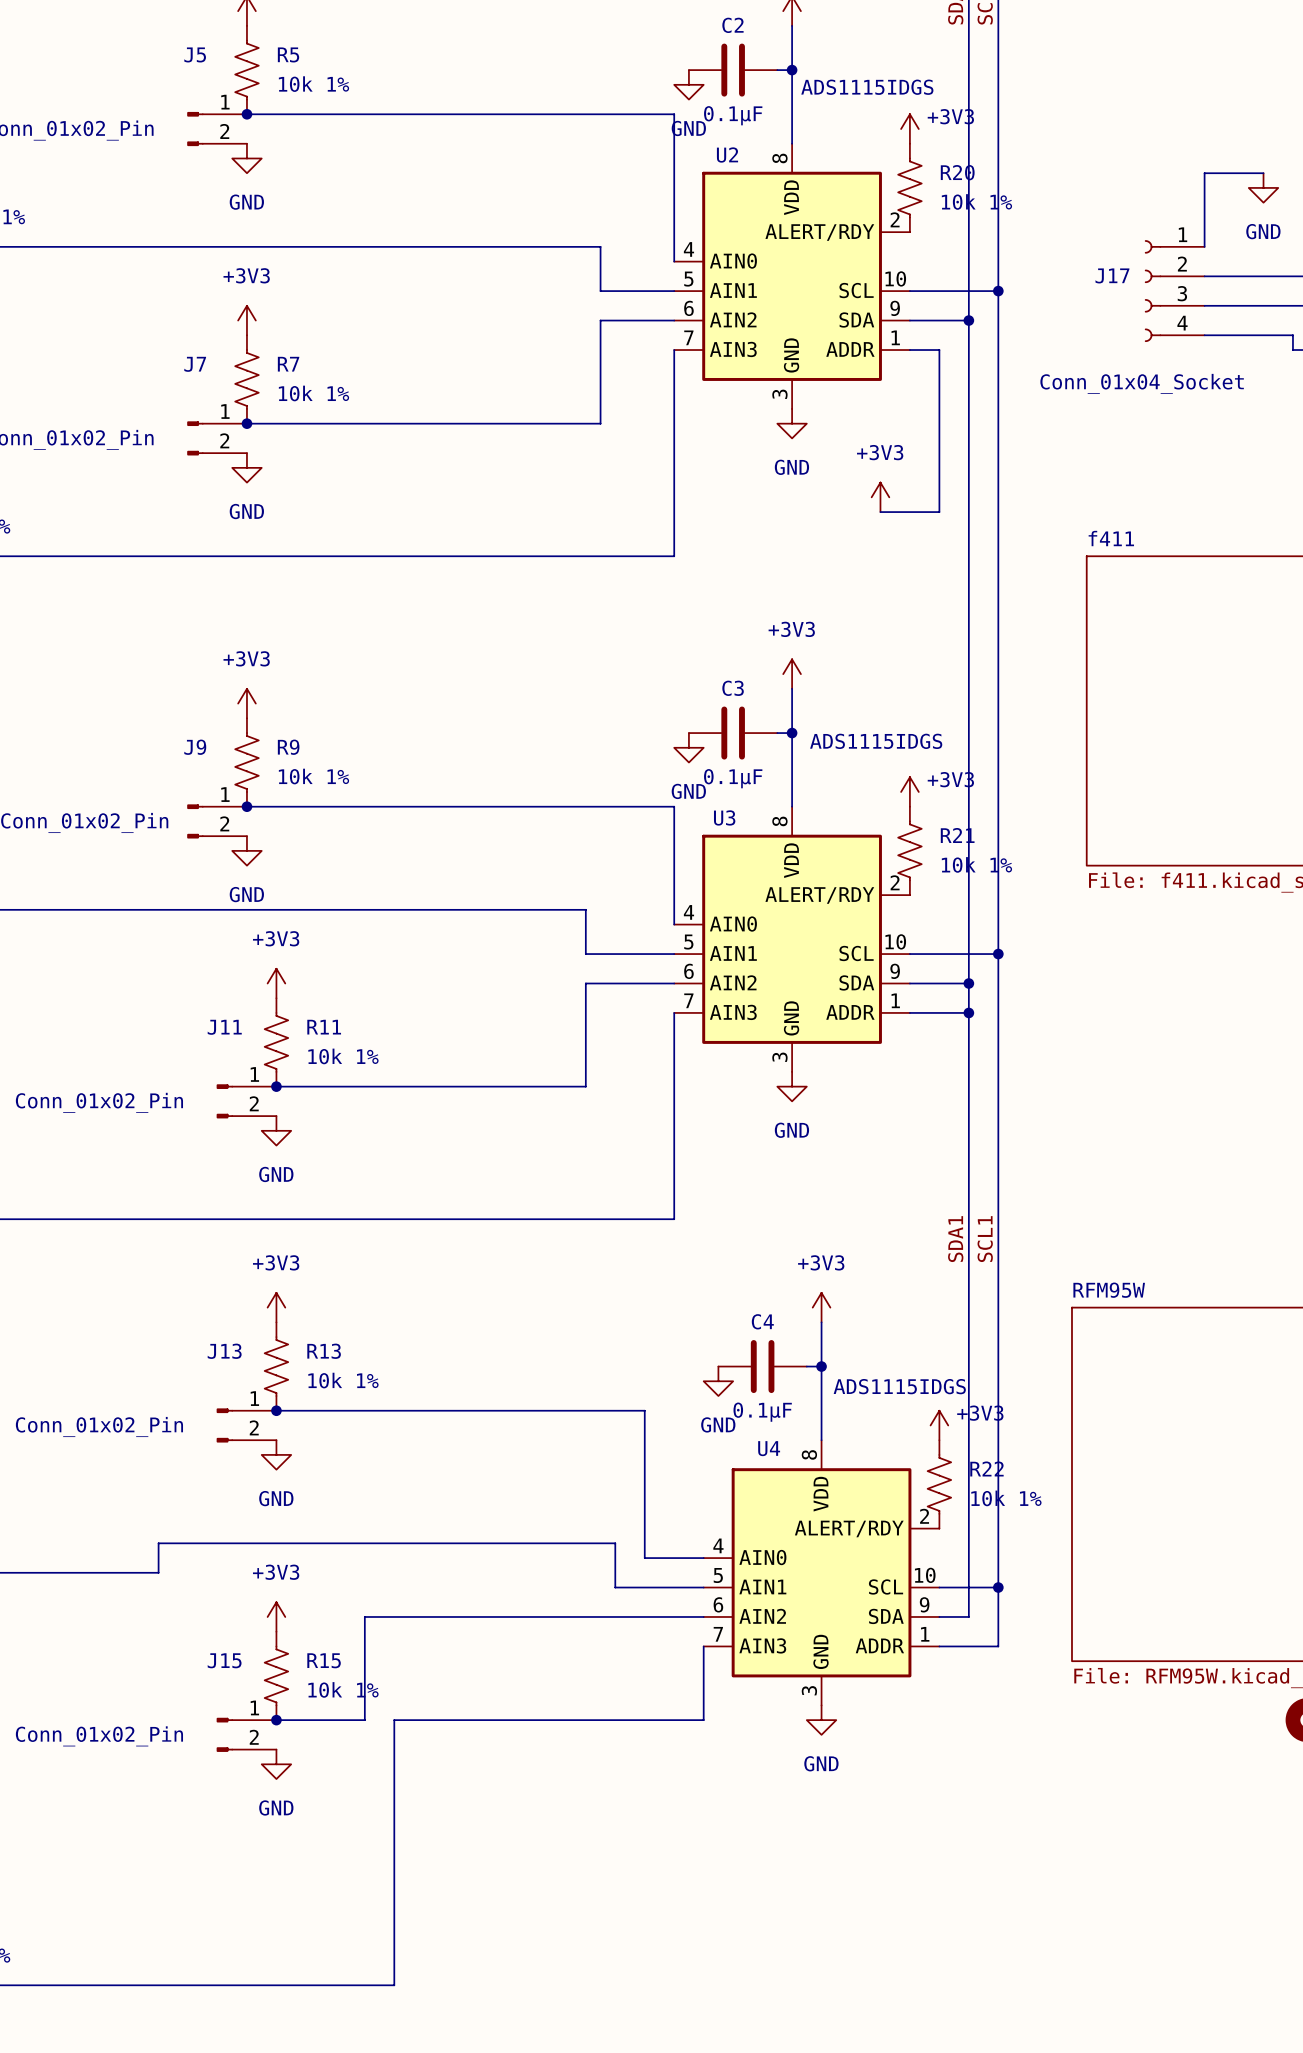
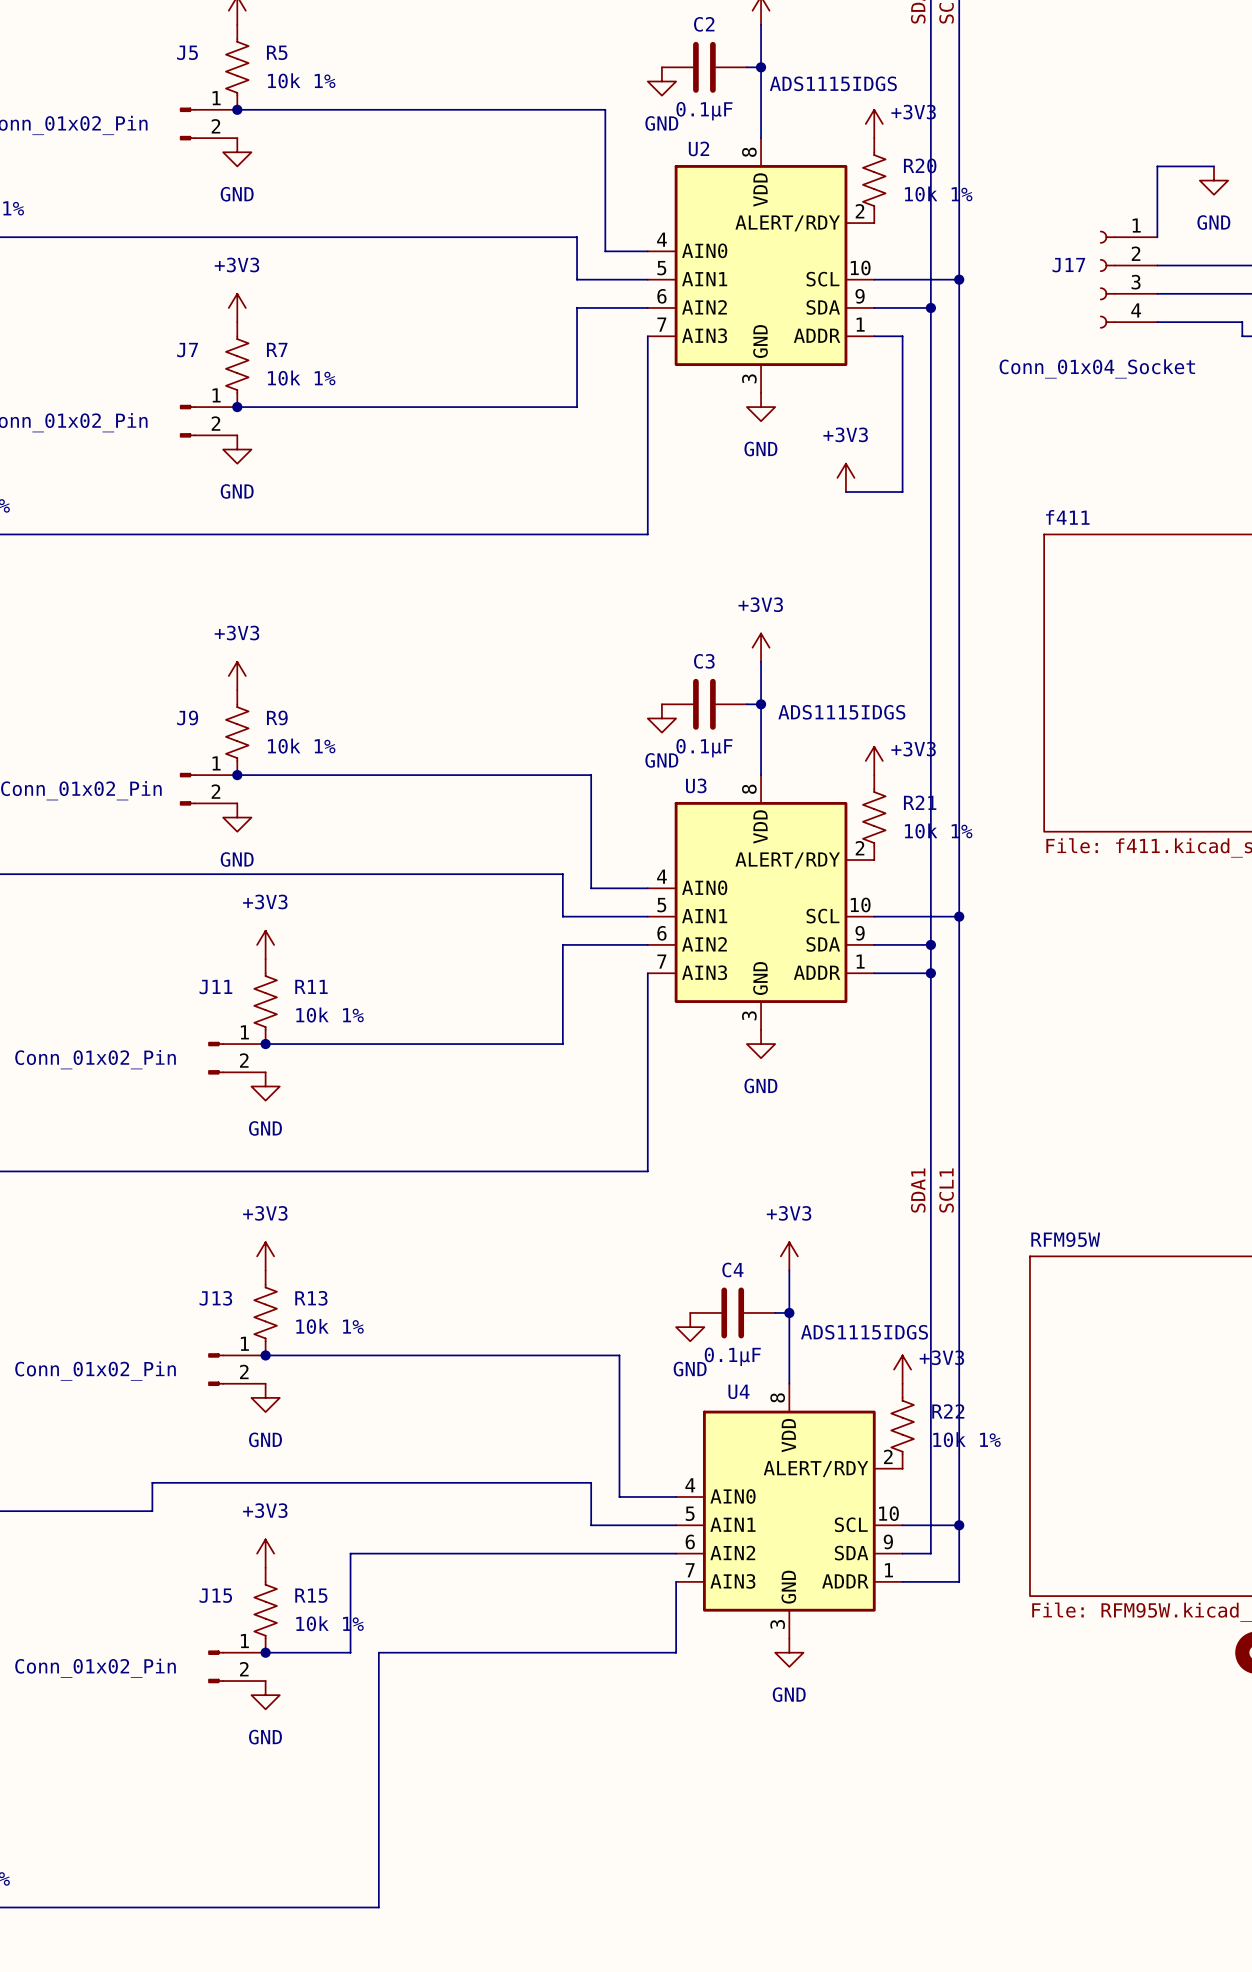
wire: (630, 114) (674, 114) (674, 261) -> (605, 109) (605, 251) (647, 251)
wire: (615, 806) (674, 806) (674, 924) -> (591, 775) (591, 888) (647, 888)

